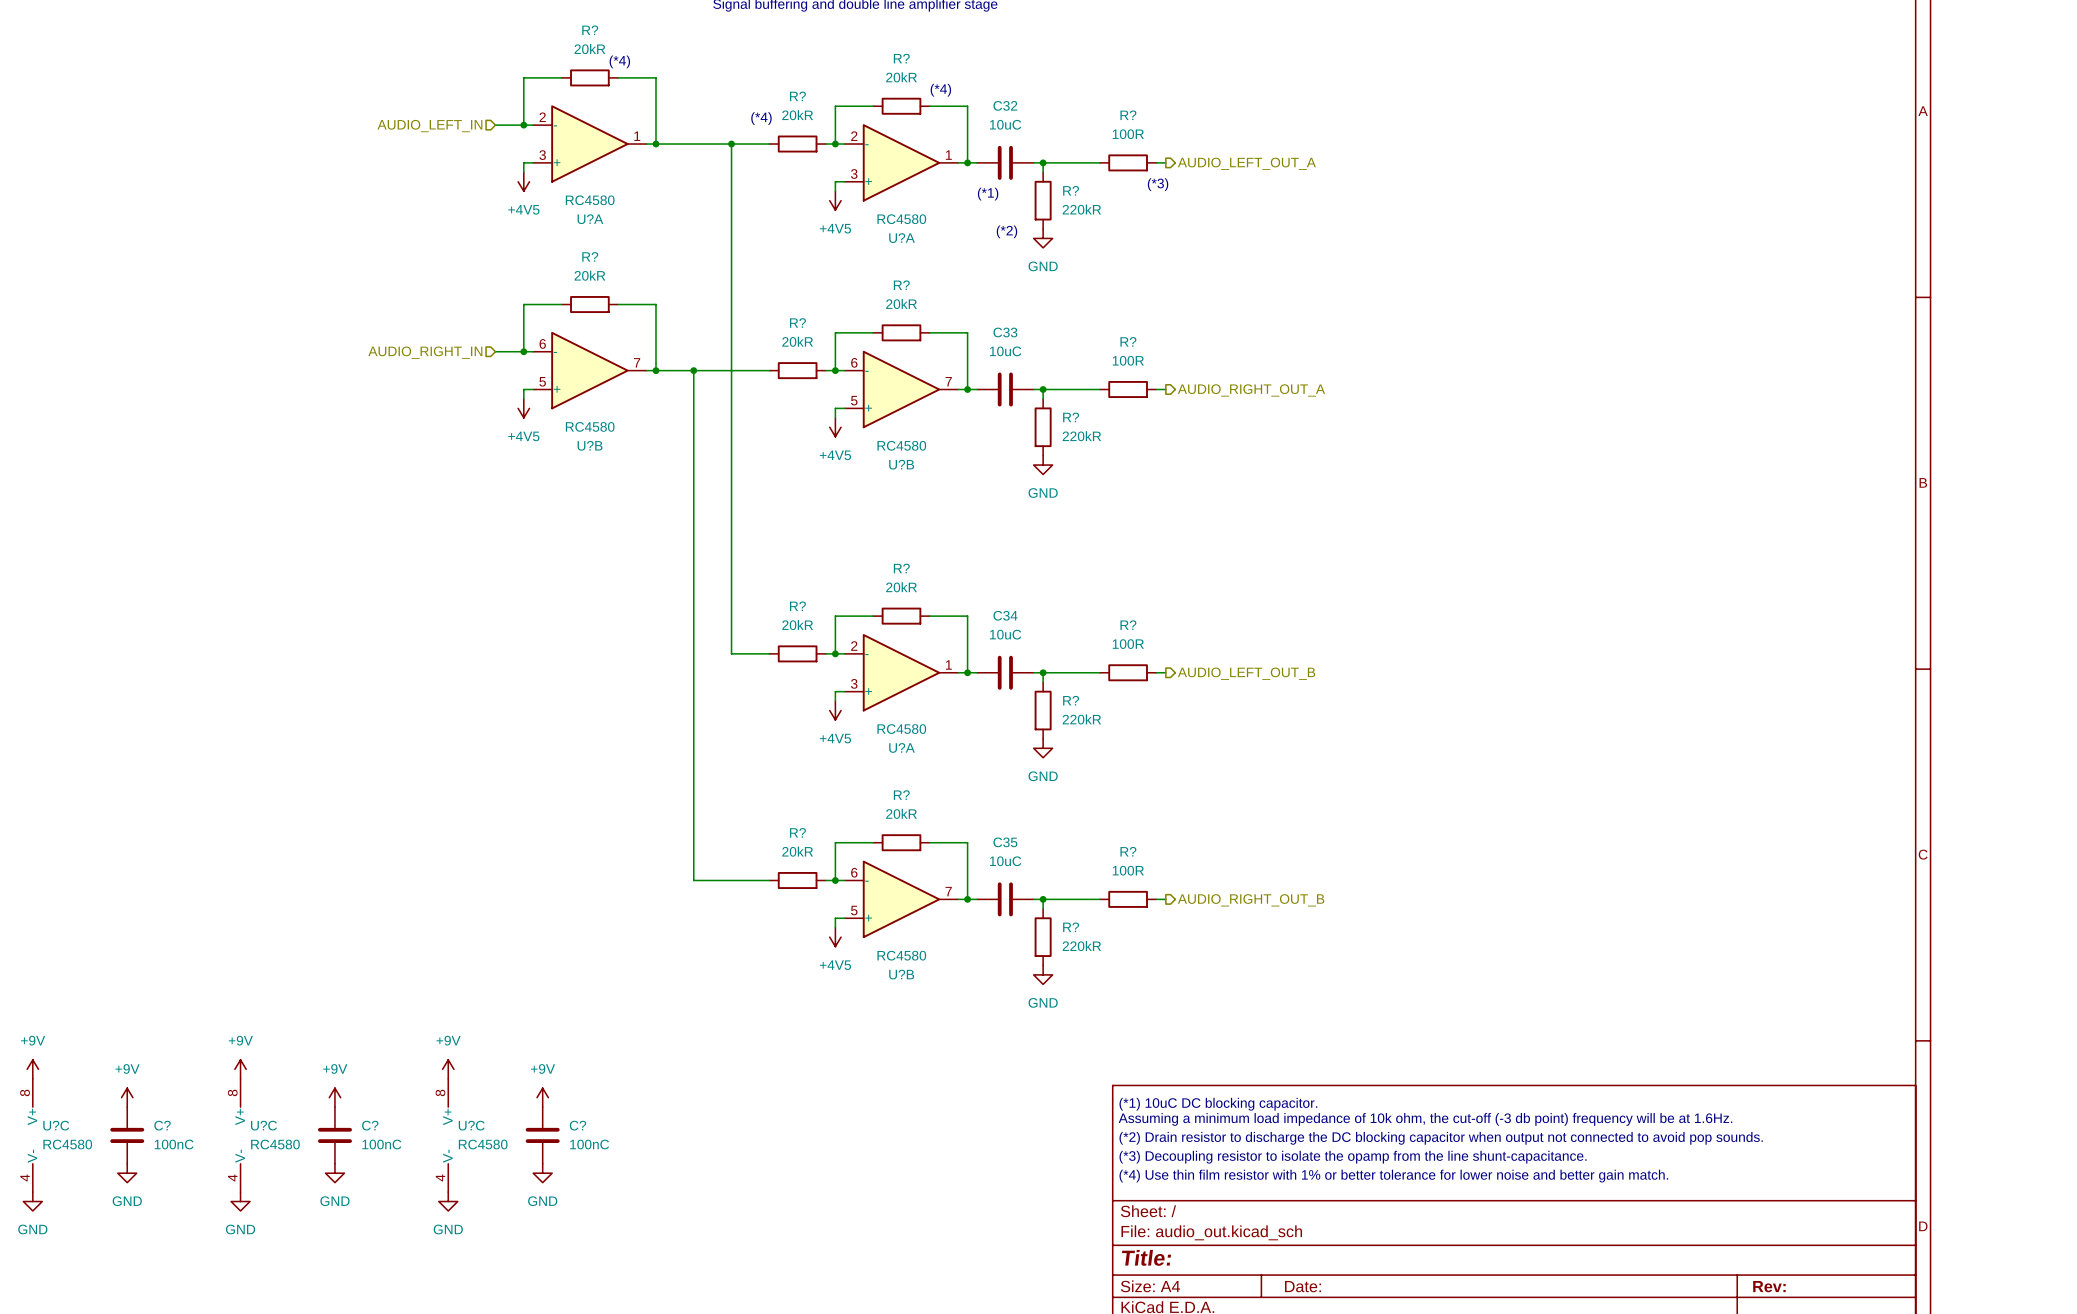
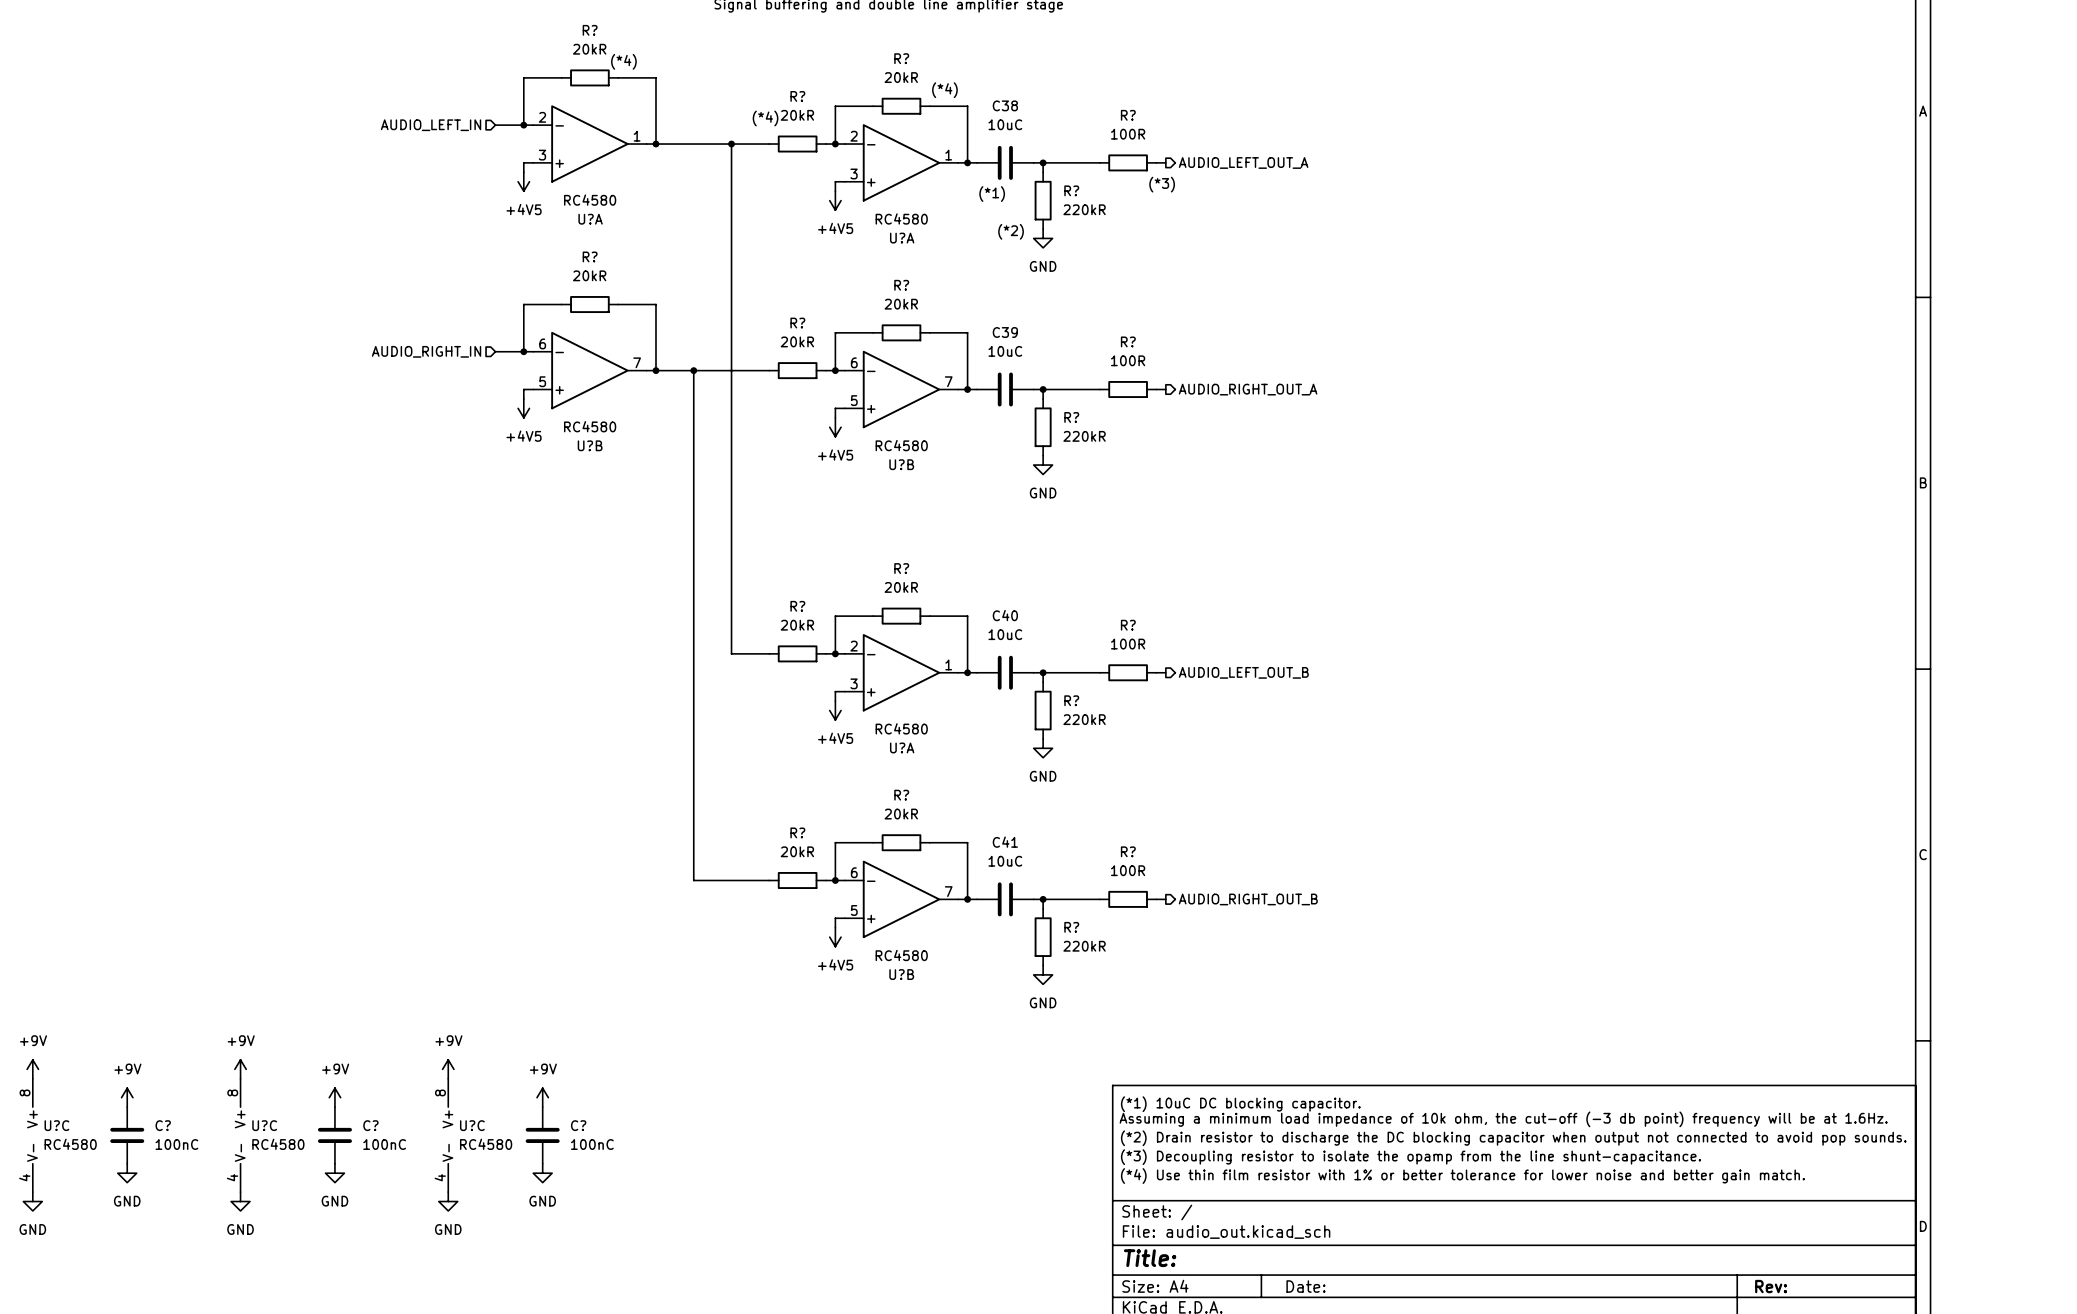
C32 name: C32 (1005, 105) -> C38 (1005, 105)
C33 name: C33 (1005, 332) -> C39 (1005, 332)
C34 name: C34 (1005, 615) -> C40 (1005, 615)
C35 name: C35 (1005, 842) -> C41 (1005, 842)

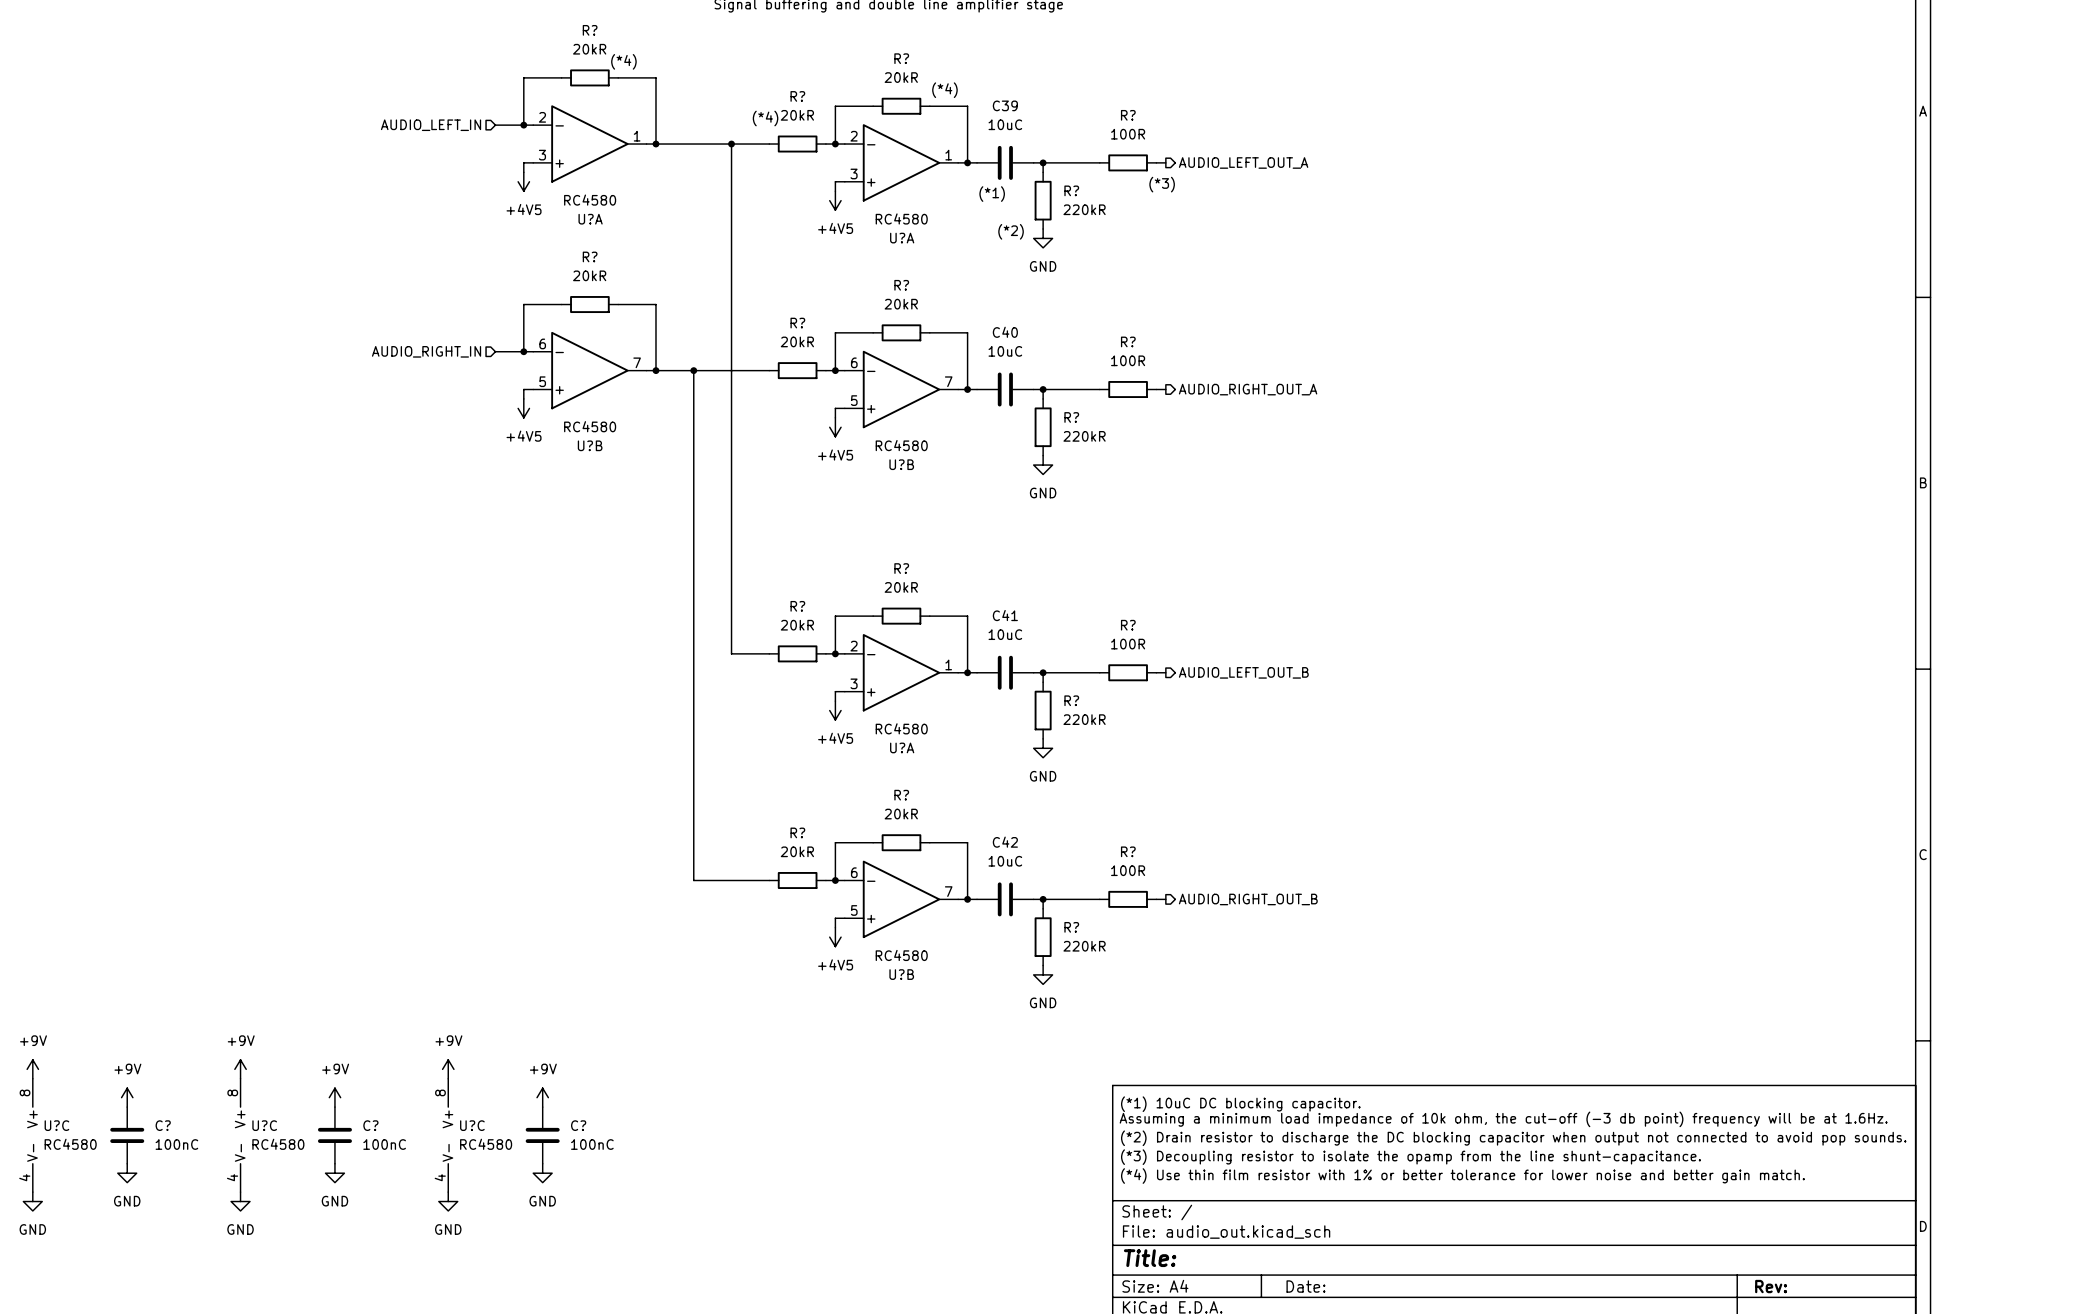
C38 name: C38 (1005, 105) -> C39 (1005, 105)
C39 name: C39 (1005, 332) -> C40 (1005, 332)
C40 name: C40 (1005, 615) -> C41 (1005, 615)
C41 name: C41 (1005, 842) -> C42 (1005, 842)

